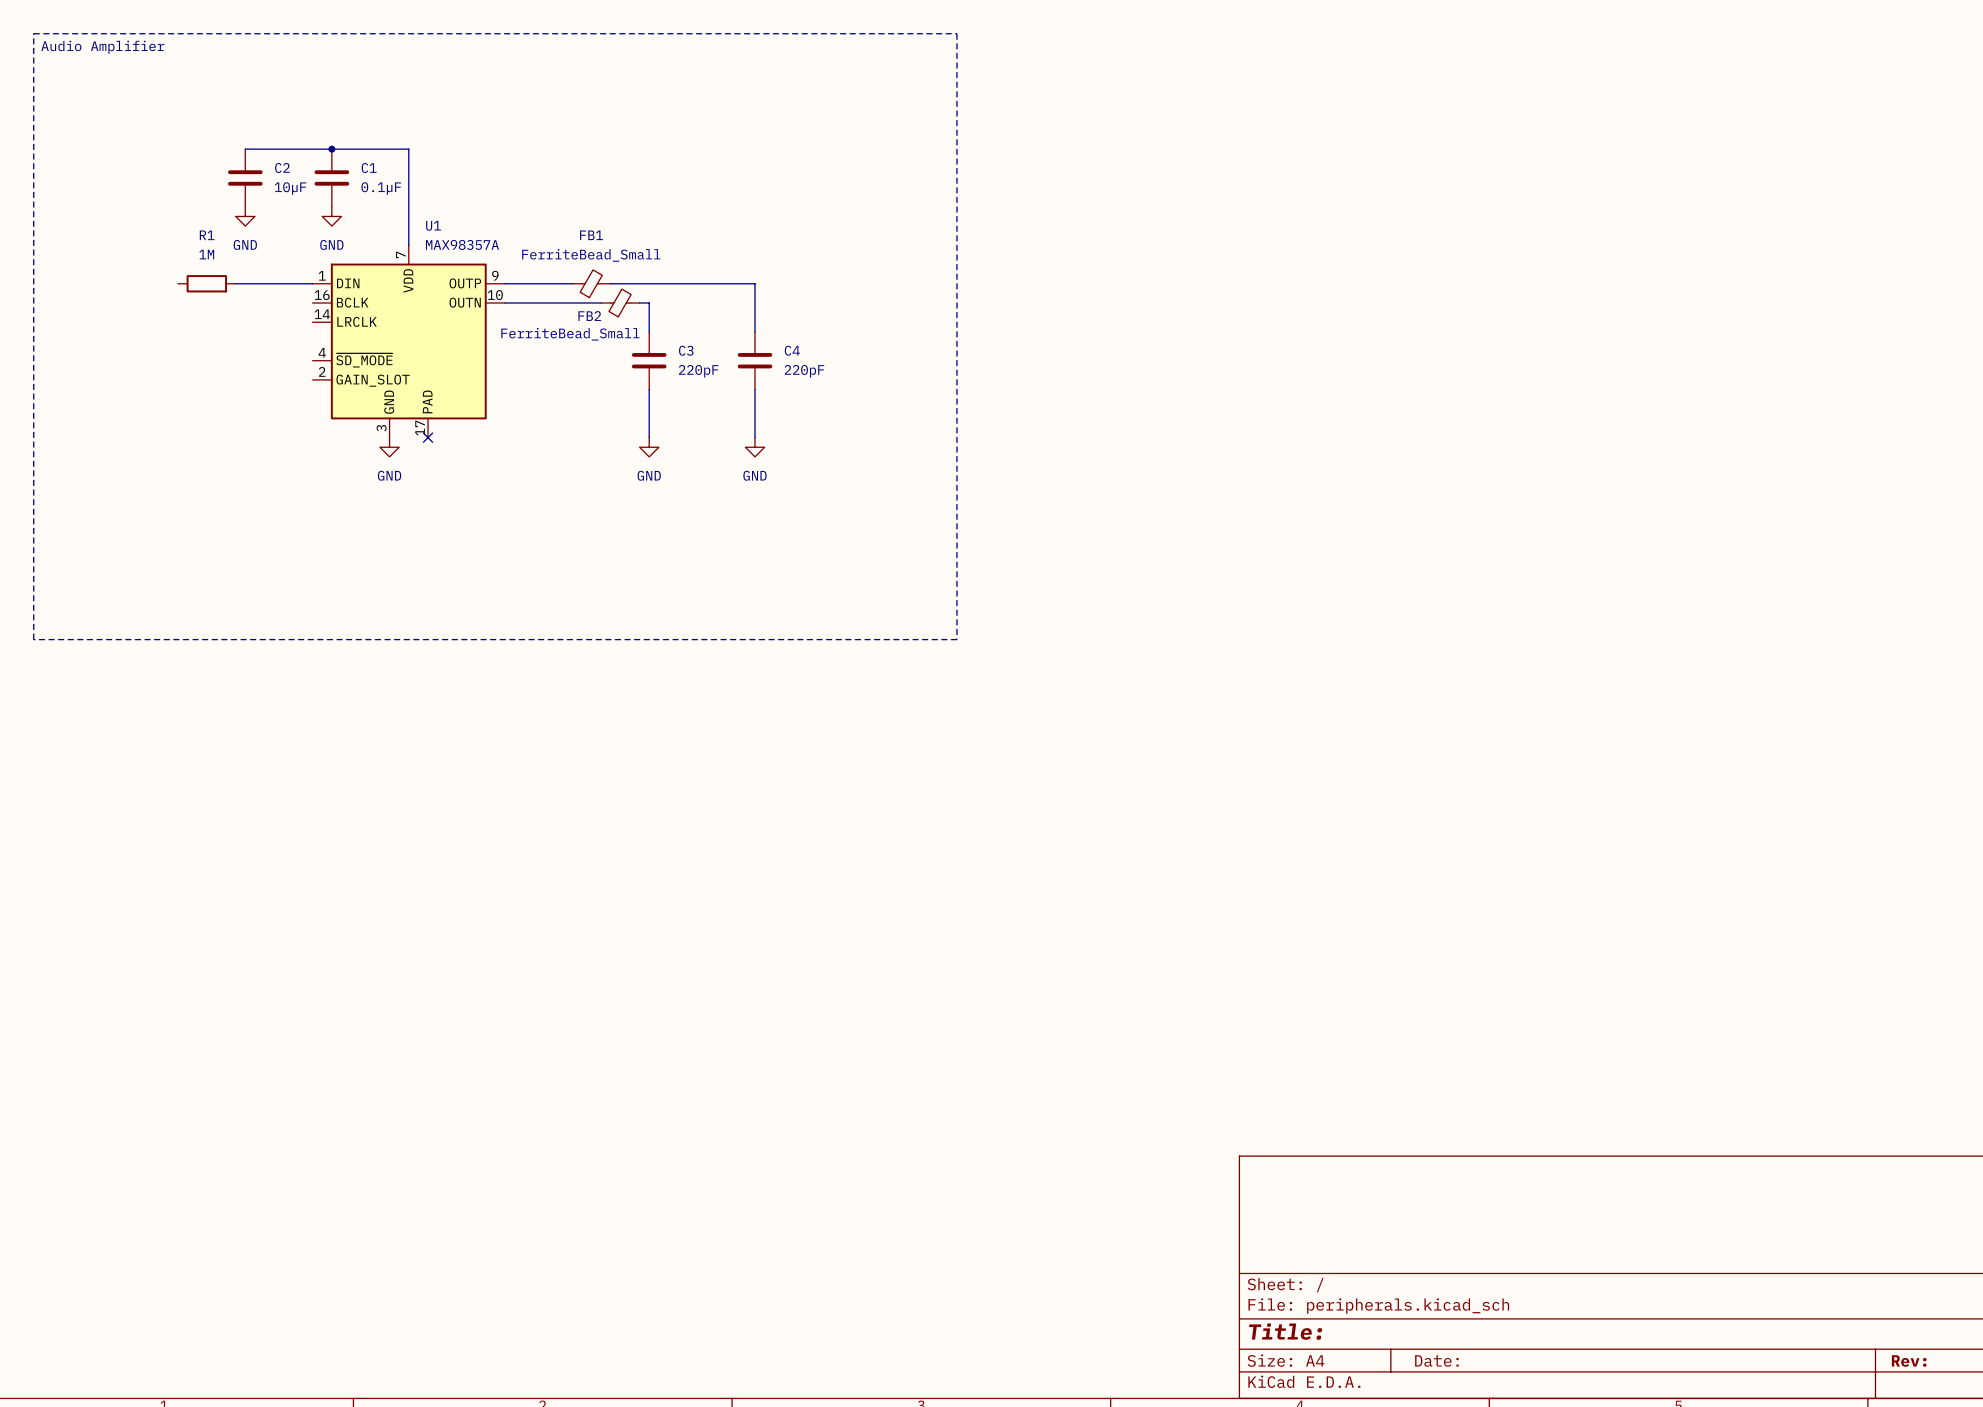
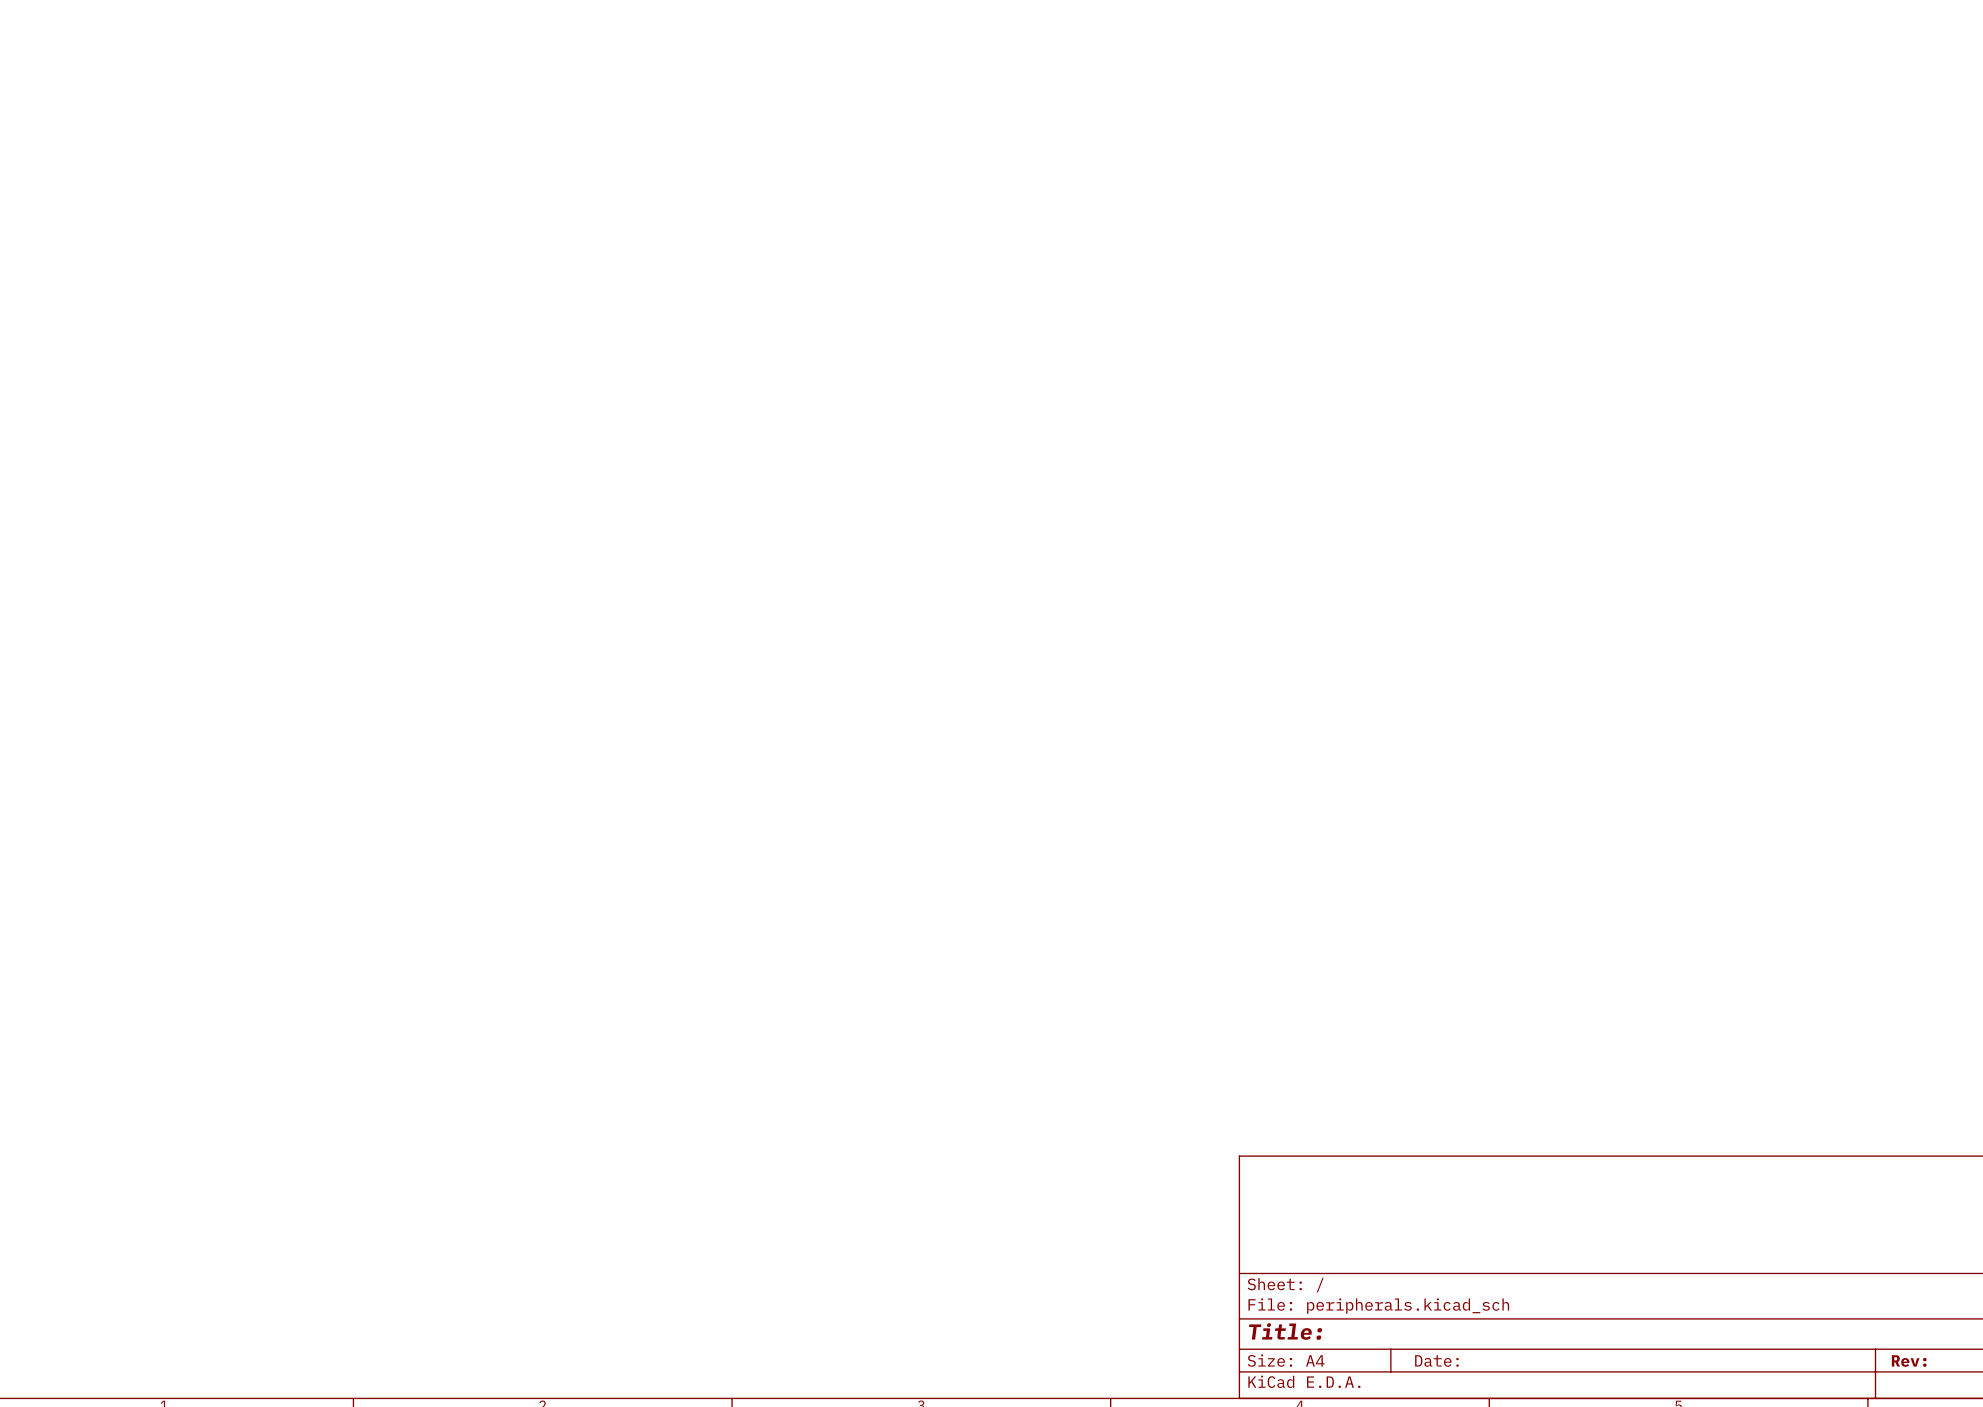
line: (33, 33) (956, 33) (956, 639) (33, 639) (33, 33) -> none
text: Audio Amplifier (102, 47) -> none
wire: (245, 149) (408, 149) (408, 245) -> none
junction: (331, 149) -> none
C2: 10µF (245, 177) -> none
C1: 0.1µF (331, 177) -> none
power symbol: GND (245, 216) -> none
power symbol: GND (331, 216) -> none
R1: 1M (206, 283) -> none
wire: (235, 283) (312, 283) -> none
wire: (504, 283) (572, 283) -> none
FB1: FerriteBead_Small (591, 283) -> none
wire: (610, 283) (755, 283) (755, 331) -> none
wire: (504, 303) (601, 303) -> none
FB2: FerriteBead_Small (620, 303) -> none
wire: (639, 303) (649, 303) (649, 331) -> none
U1: MAX98357A (408, 341) -> none
C3: 220pF (649, 360) -> none
C4: 220pF (755, 360) -> none
wire: (649, 389) (649, 437) -> none
wire: (755, 389) (755, 437) -> none
no-connect mark: (428, 437) -> none
power symbol: GND (389, 447) -> none
power symbol: GND (649, 447) -> none
power symbol: GND (755, 447) -> none

